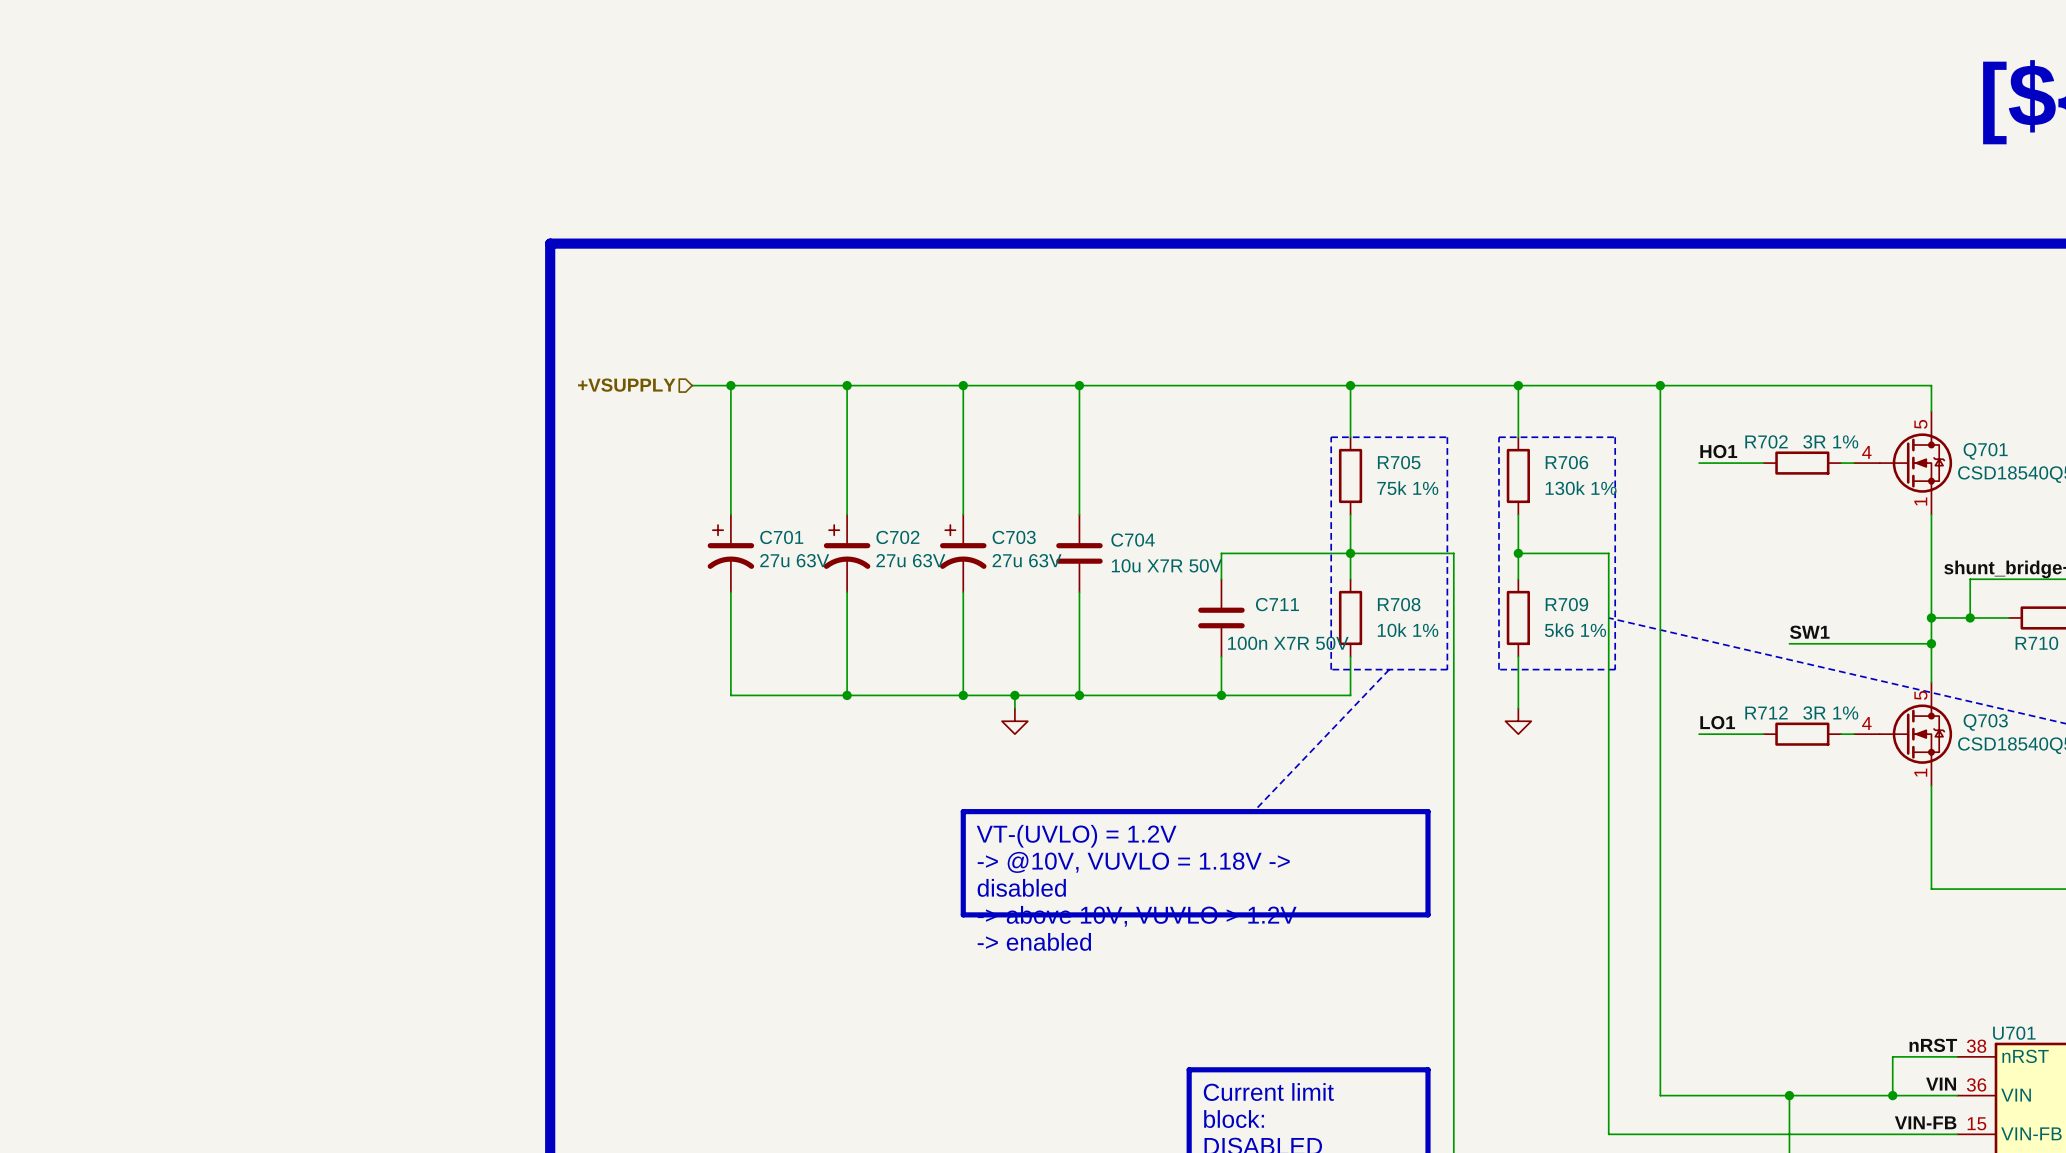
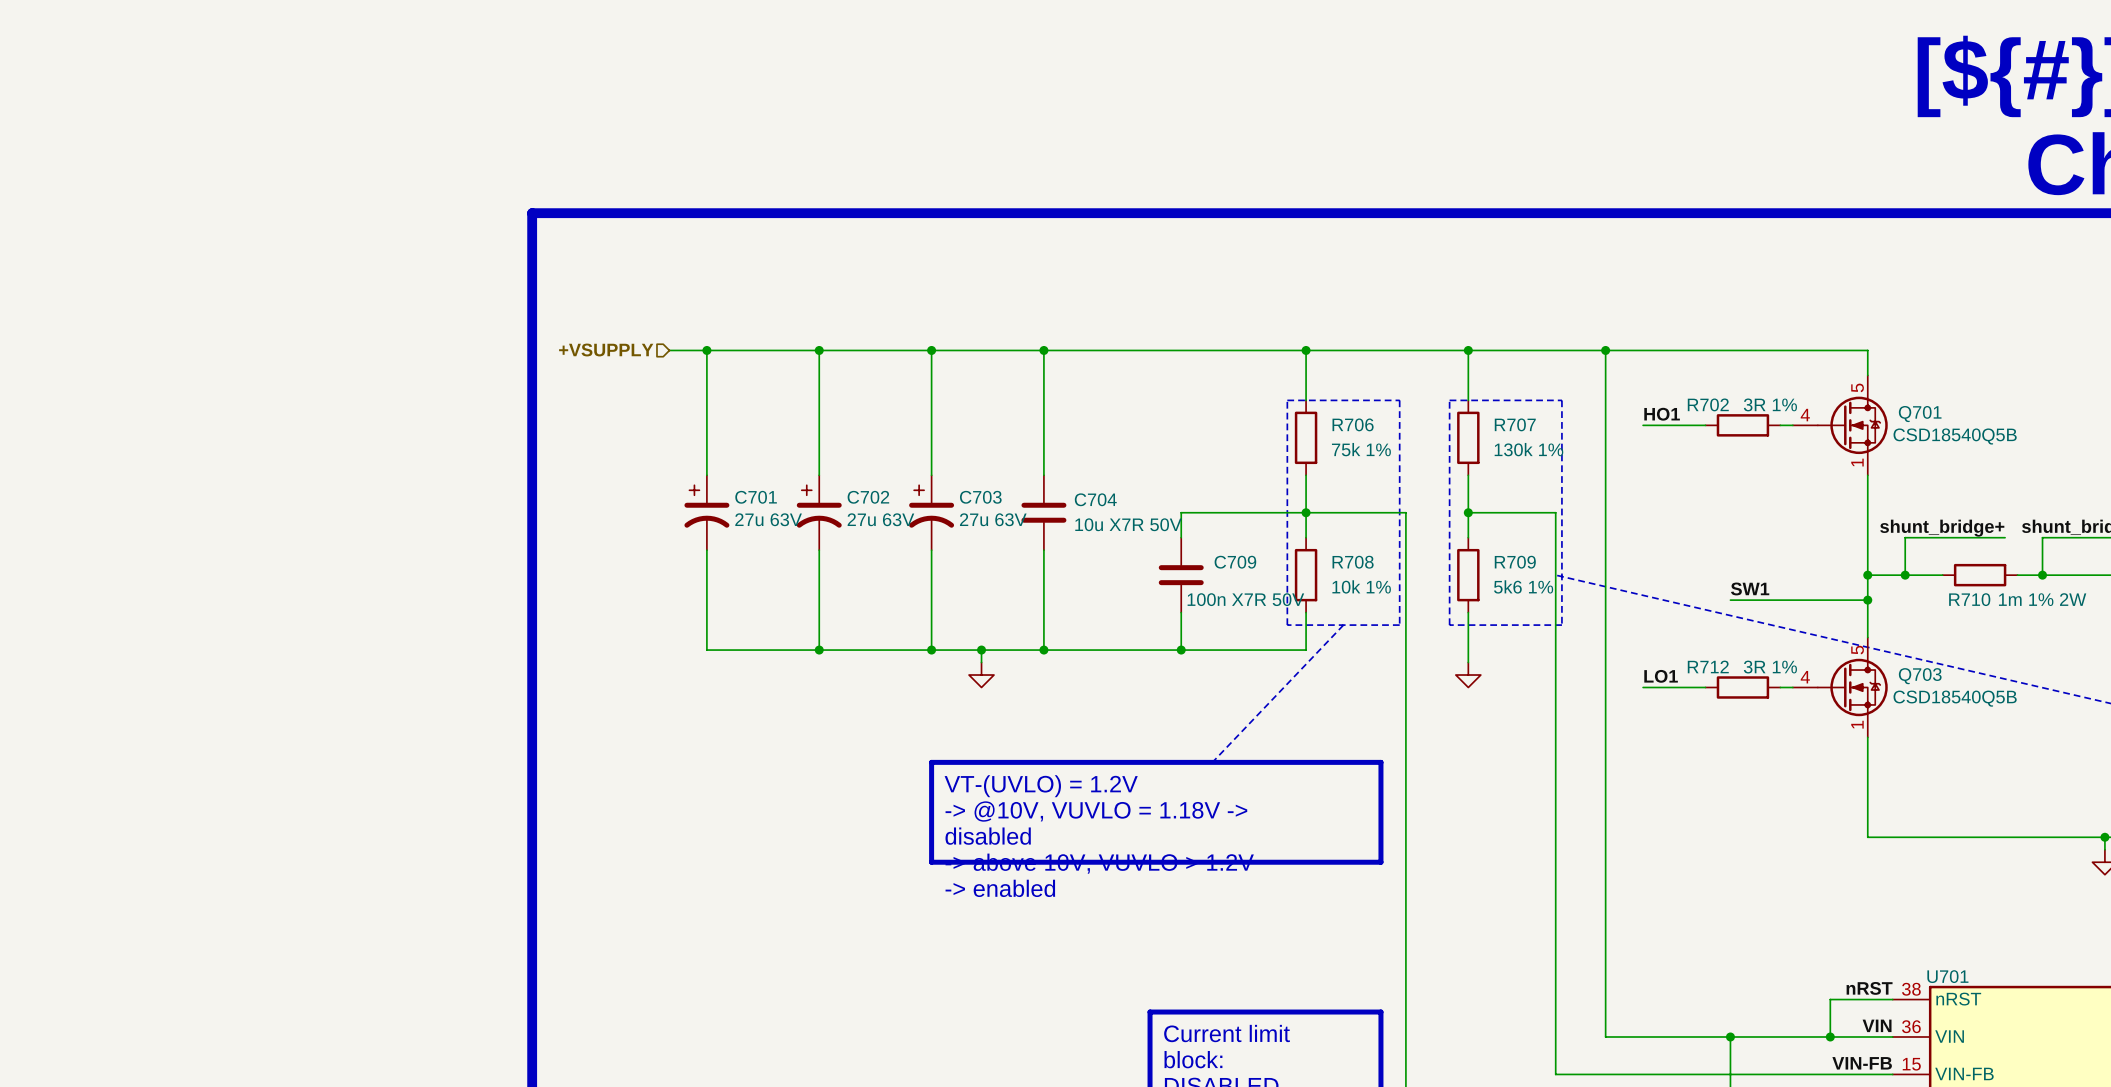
R705 name: R705 (1399, 462) -> R706 (1353, 424)
R706 name: R706 (1566, 462) -> R707 (1515, 424)
C711 name: C711 (1277, 604) -> C709 (1235, 562)

